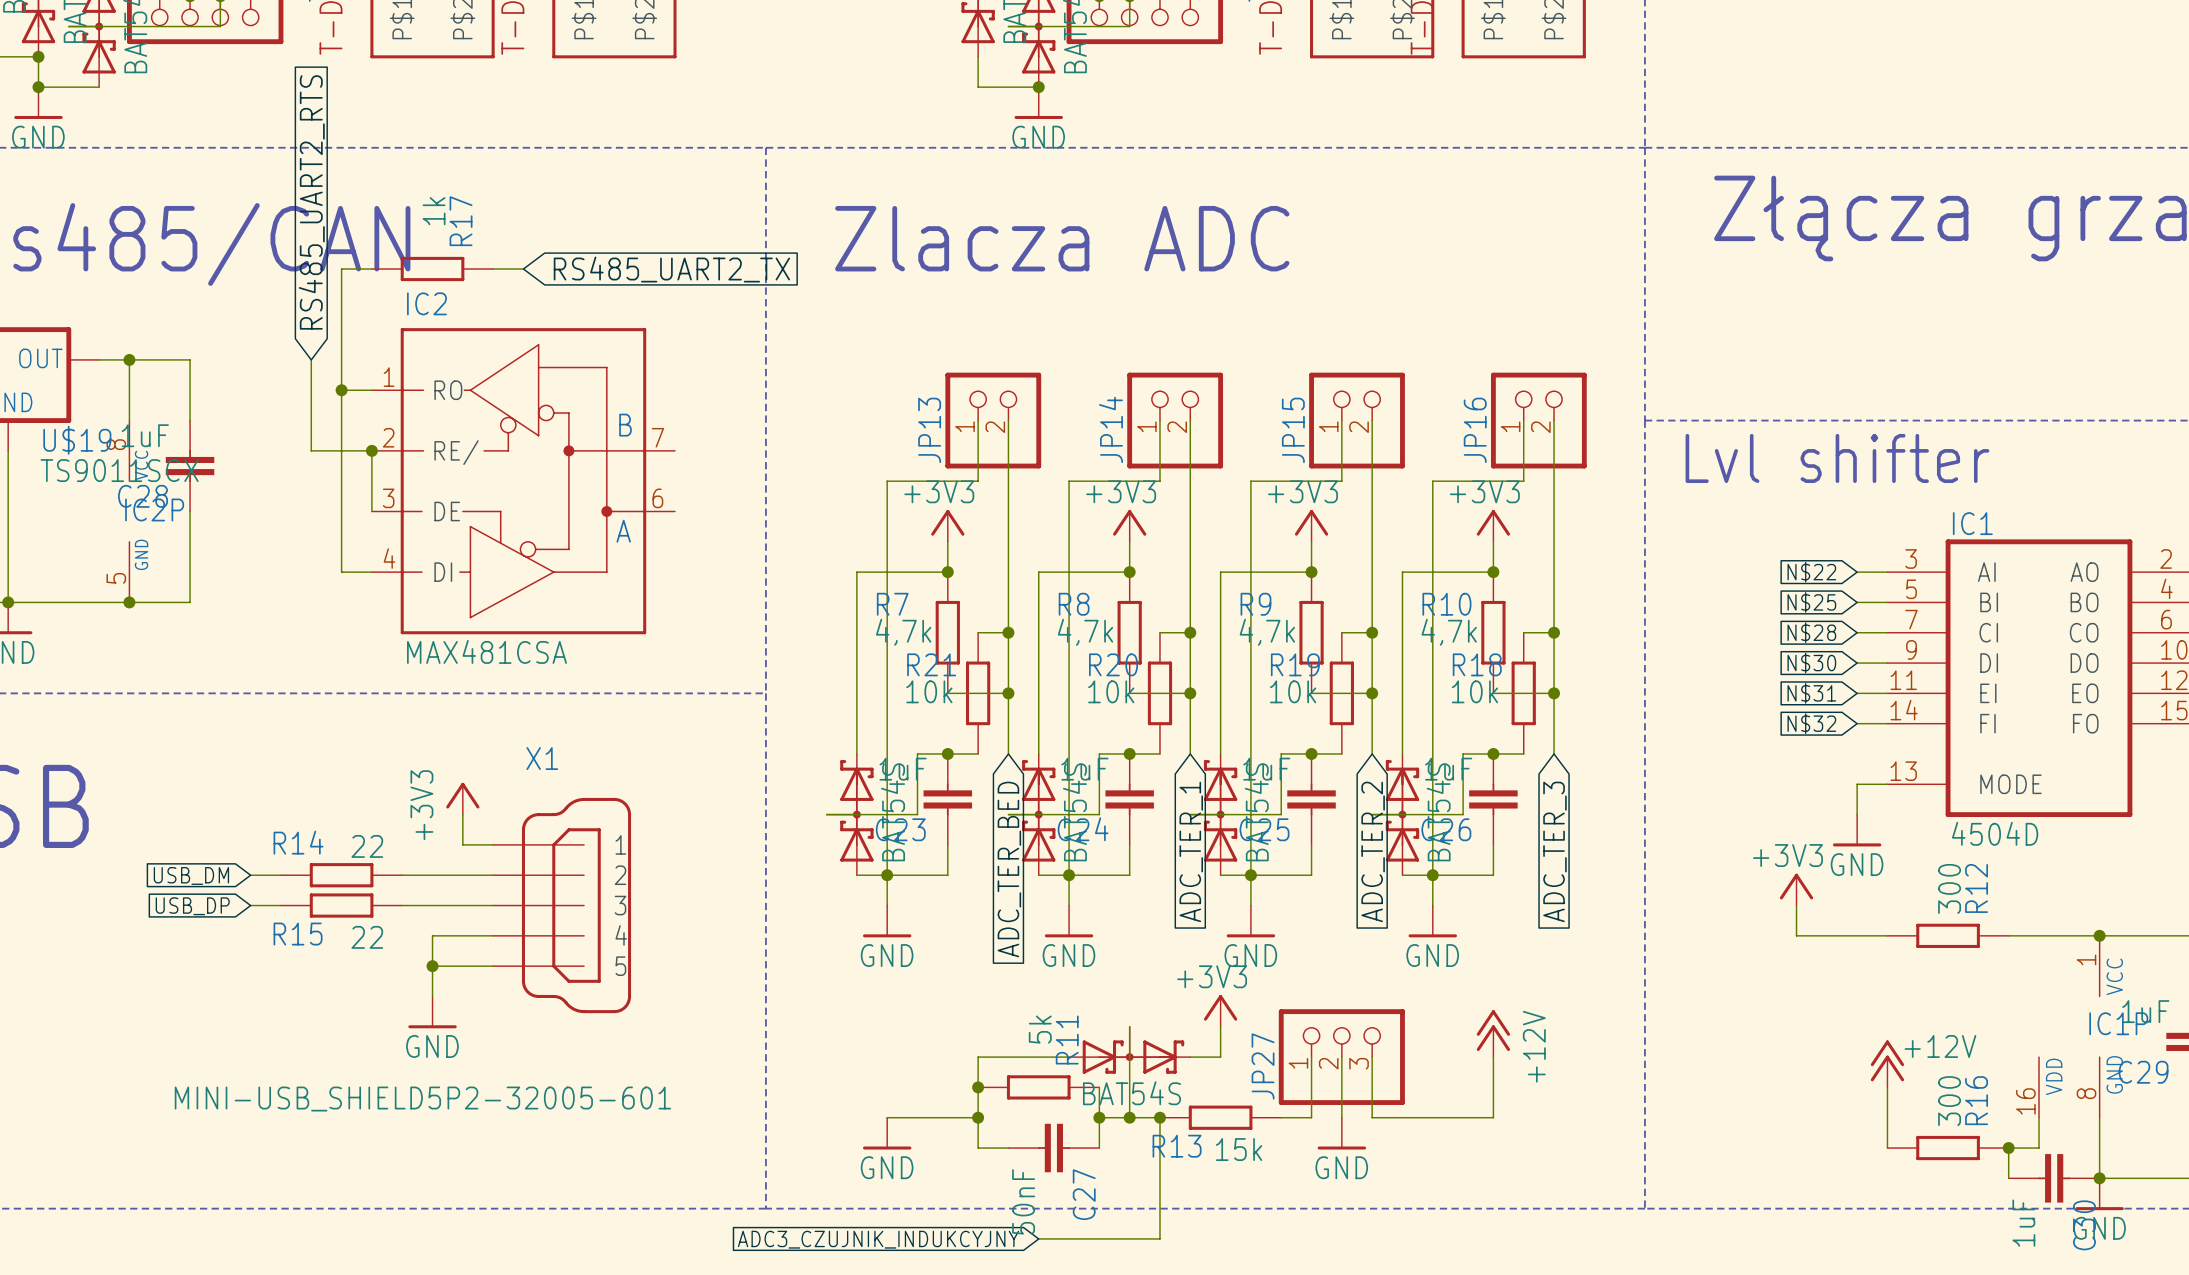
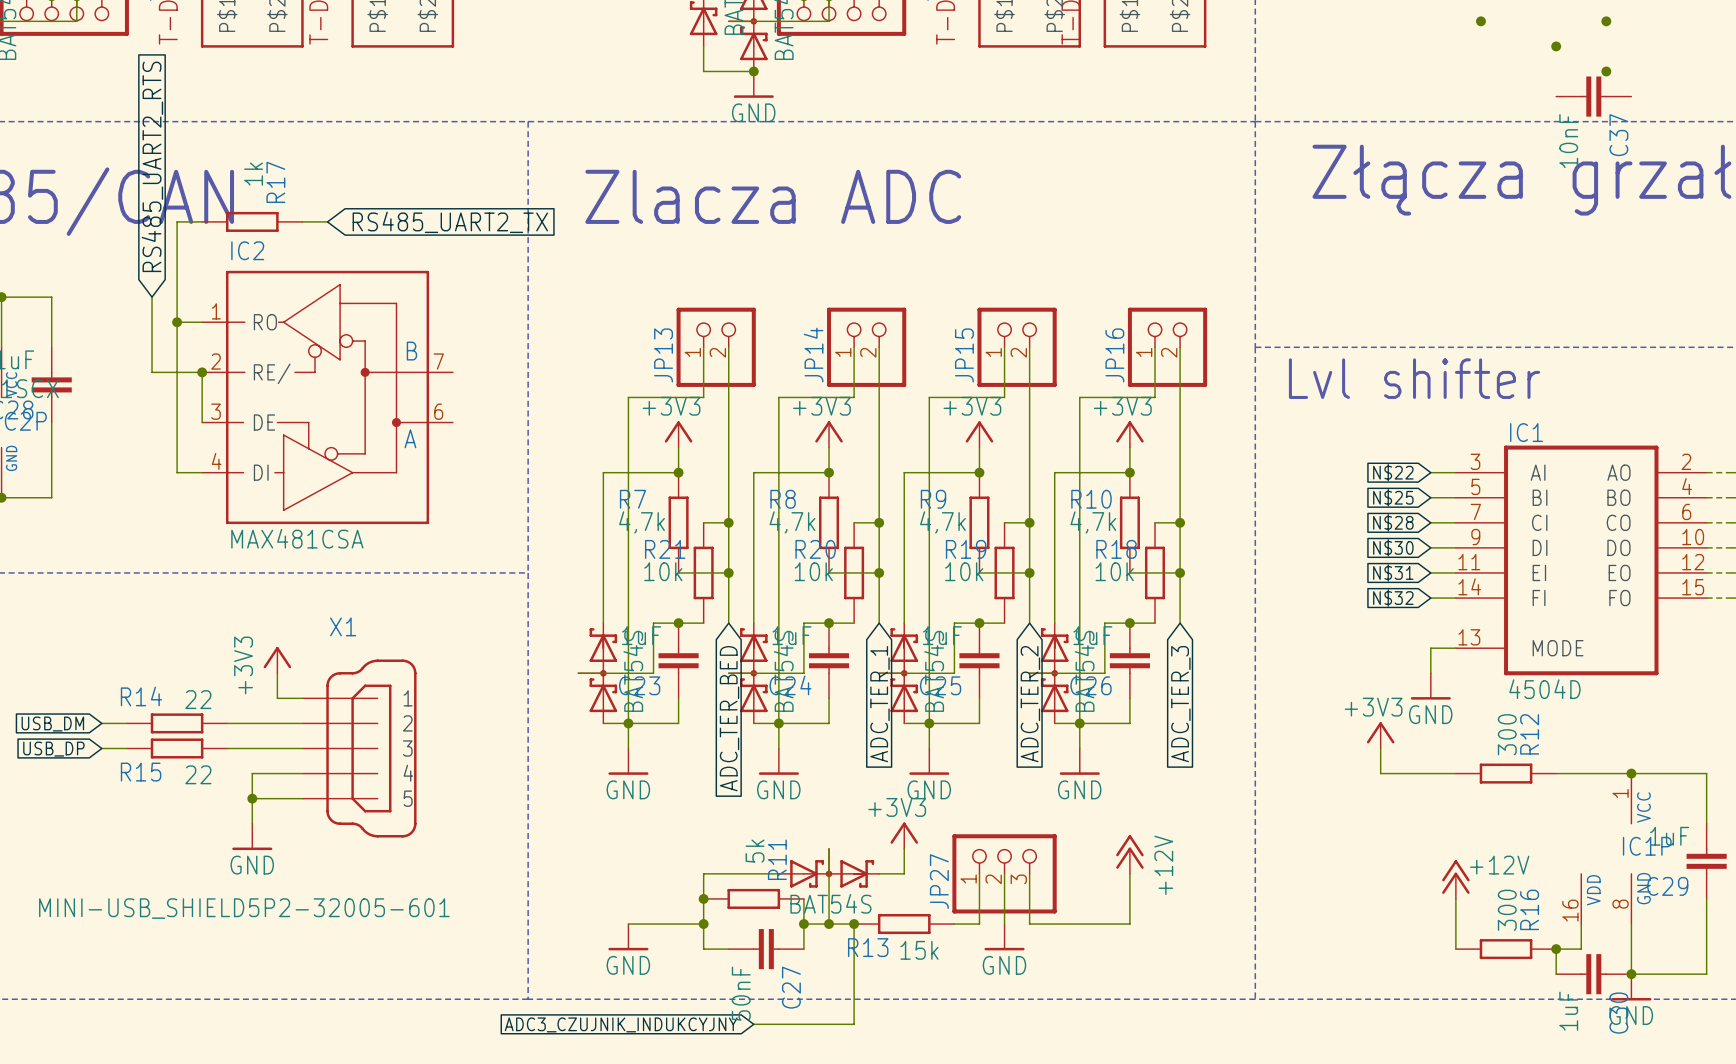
junction: none -> (1480, 21)
junction: none -> (1606, 21)
junction: none -> (1556, 46)
junction: none -> (1606, 71)
C37: none -> 10nF (1593, 96)

